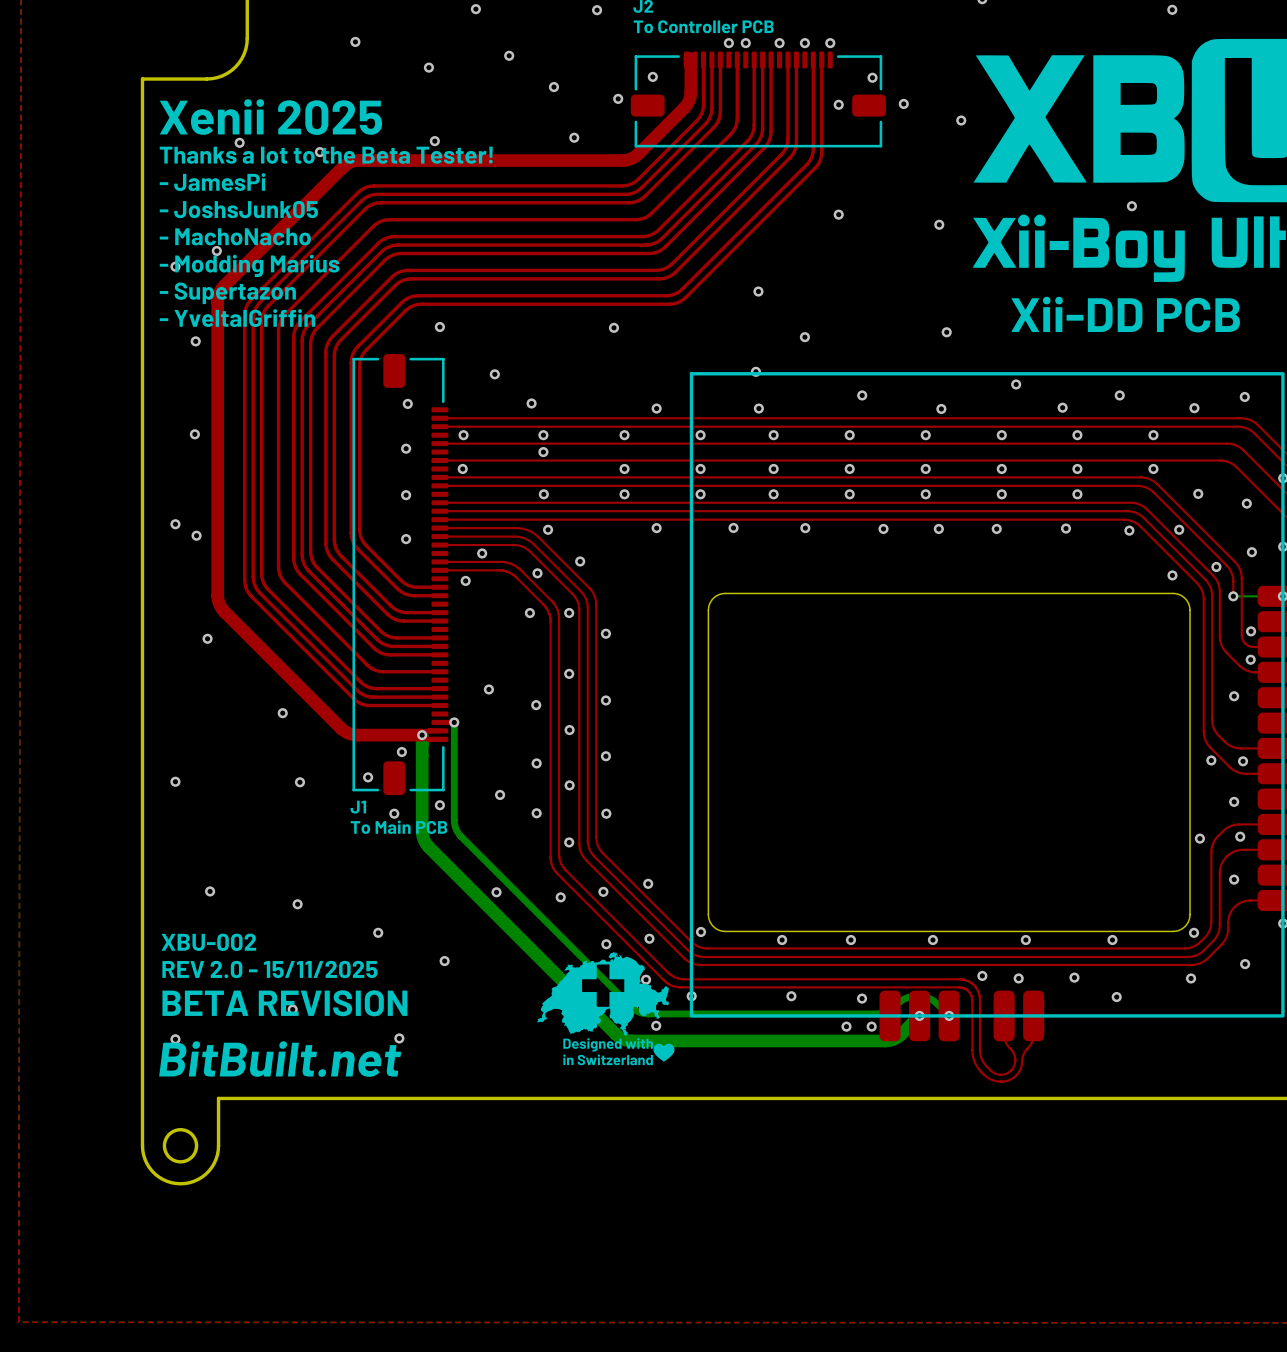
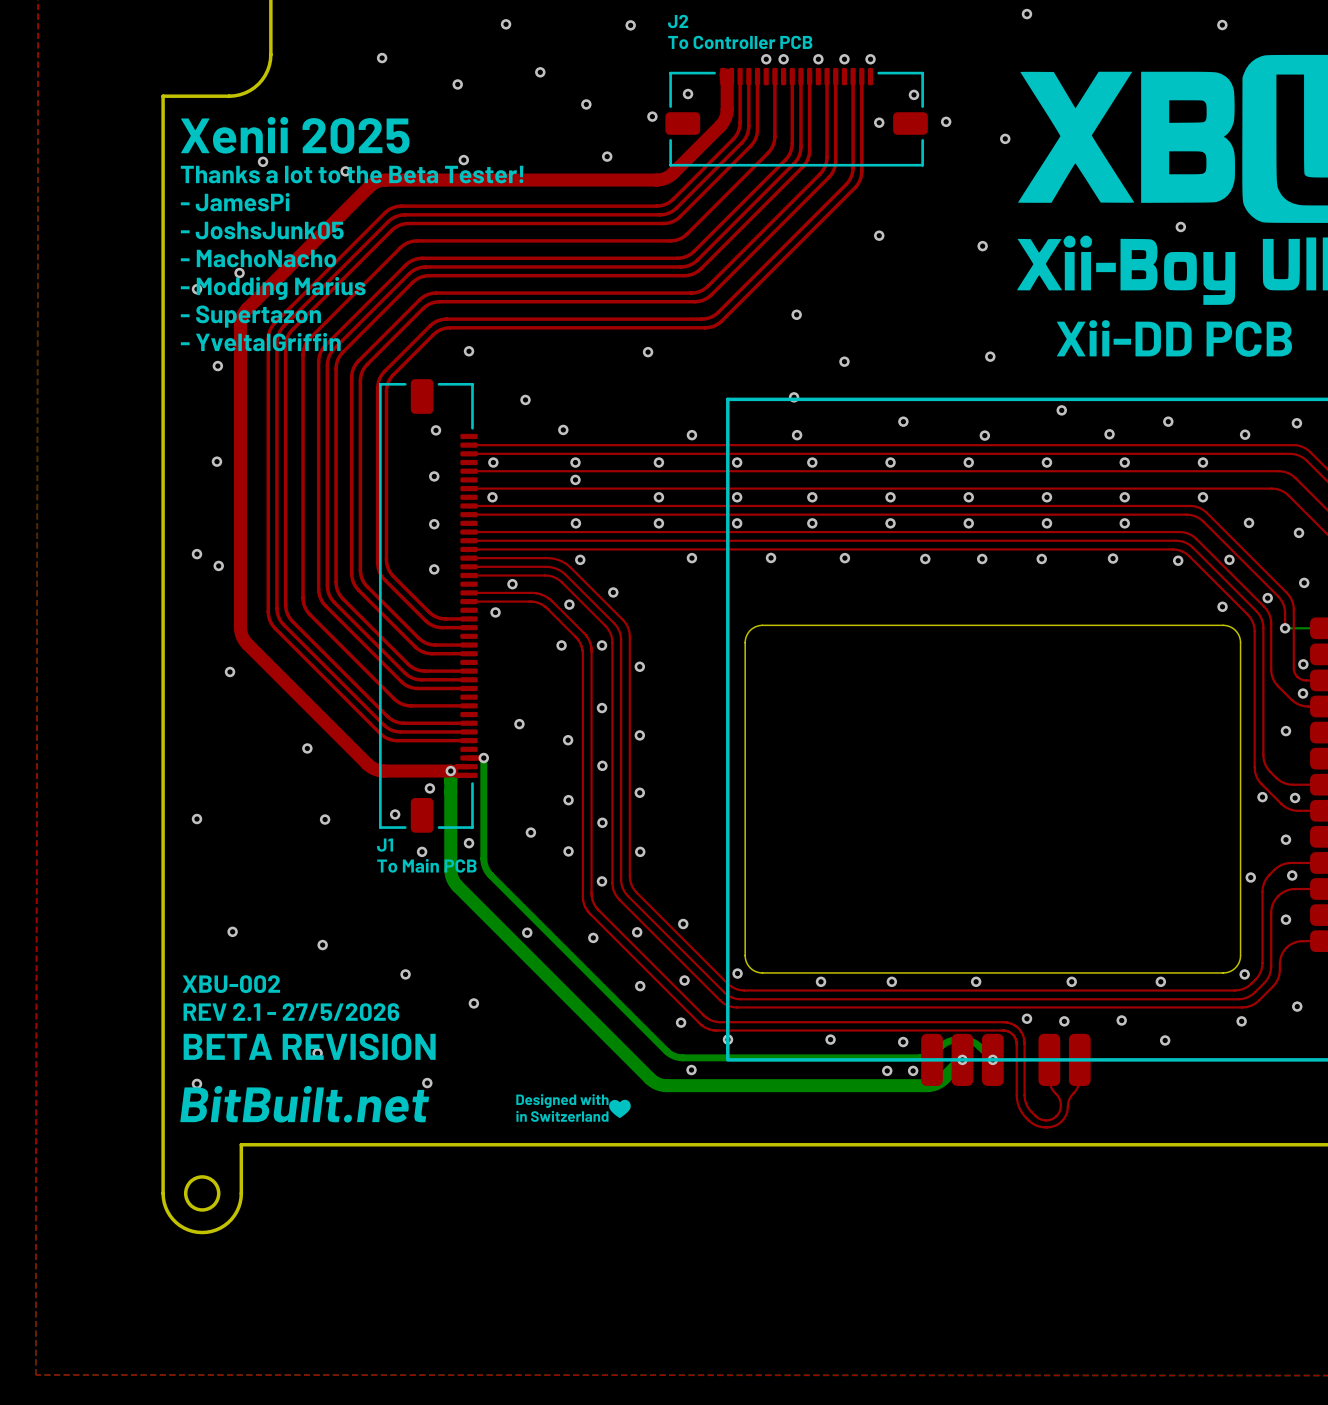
drawing: [537, 951, 669, 1036] -> none
text: REV 2.0 - 15/11/2025 (269, 969) -> REV 2.1 - 27/5/2026 (291, 1012)
text position: Designed with (608, 1044) -> Designed with (562, 1100)
drawing position: (663, 1052) -> (619, 1108)
text position: in Switzerland (608, 1059) -> in Switzerland (562, 1116)

